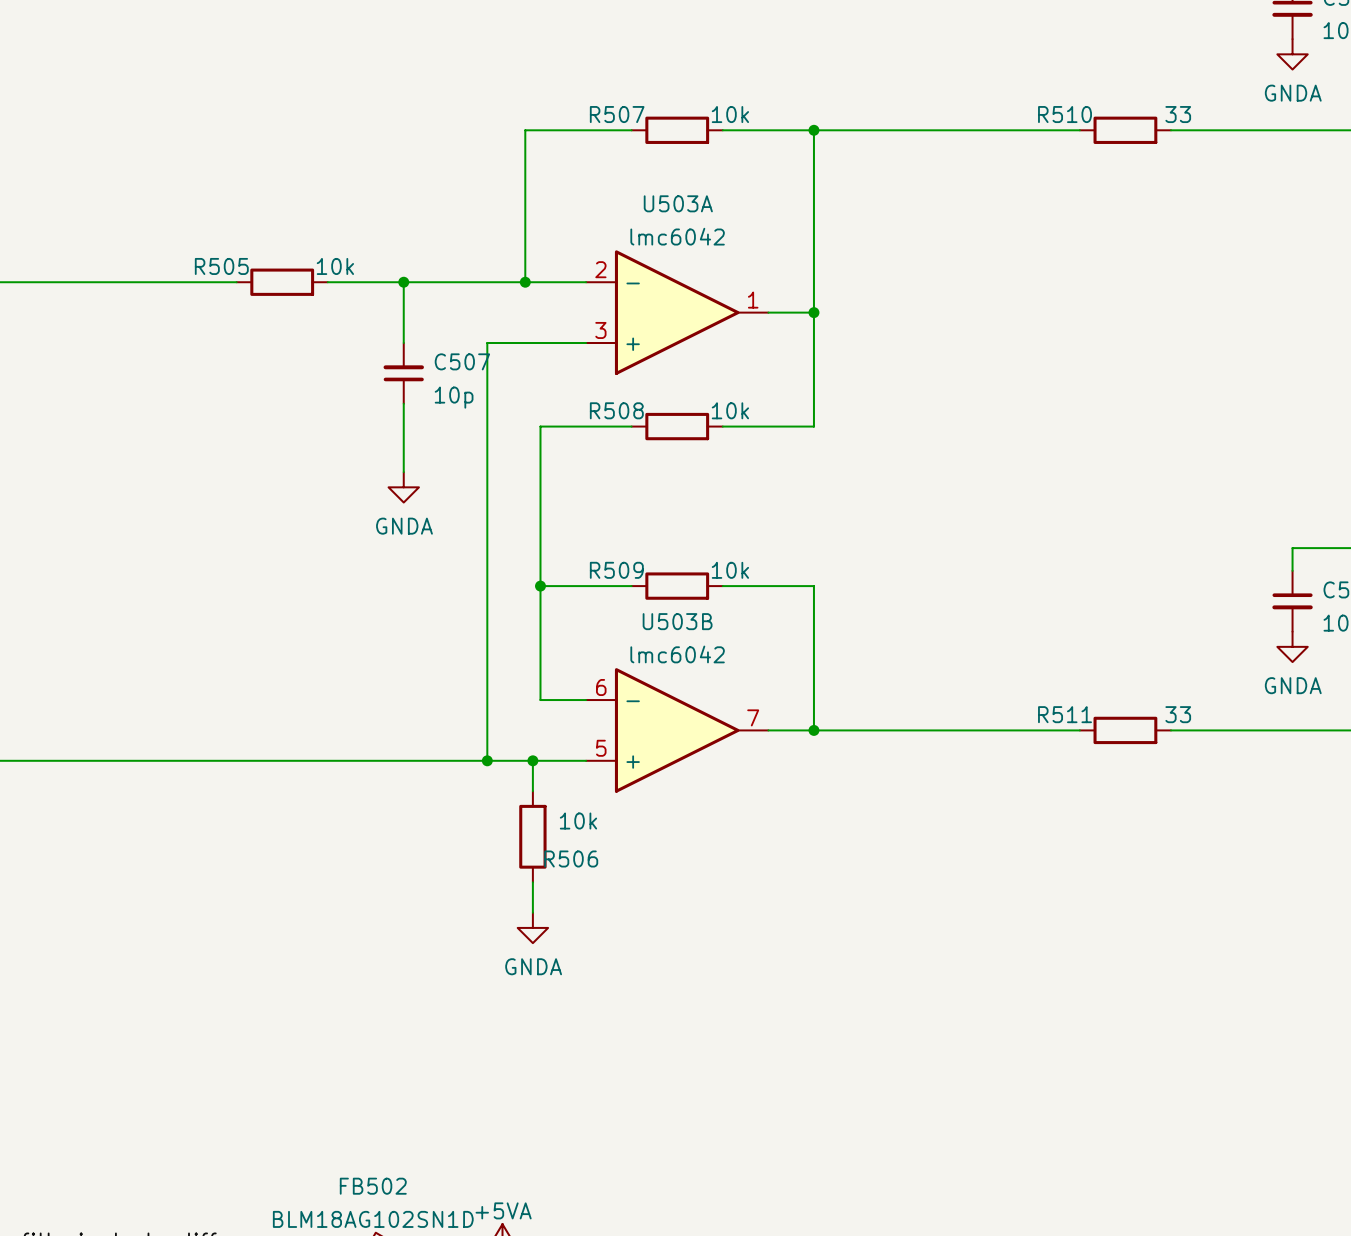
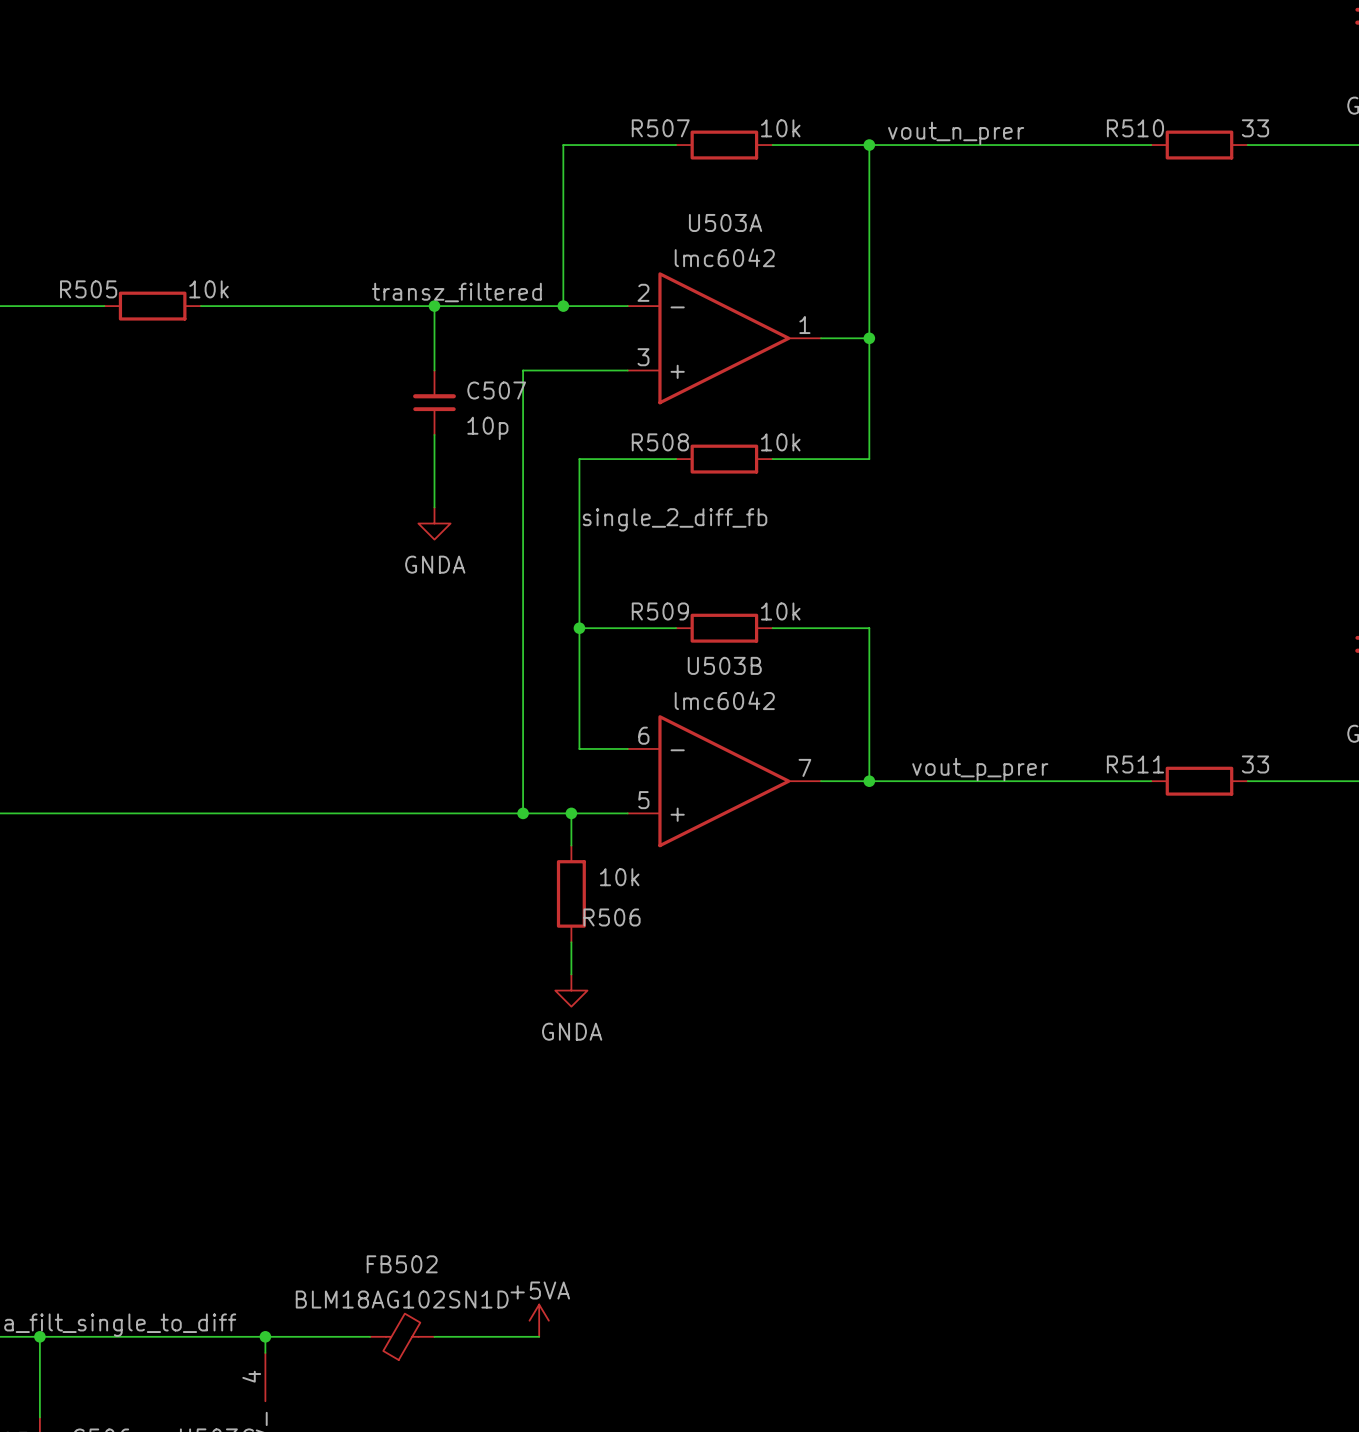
label: none -> vout_n_prer (956, 133)
label: none -> transz_filtered (456, 292)
wire: (92, 282) (183, 282) -> (257, 306) (353, 306)
R505 position: (282, 282) -> (152, 306)
label: none -> single_2_diff_fb (675, 519)
label: none -> vout_p_prer (980, 769)

